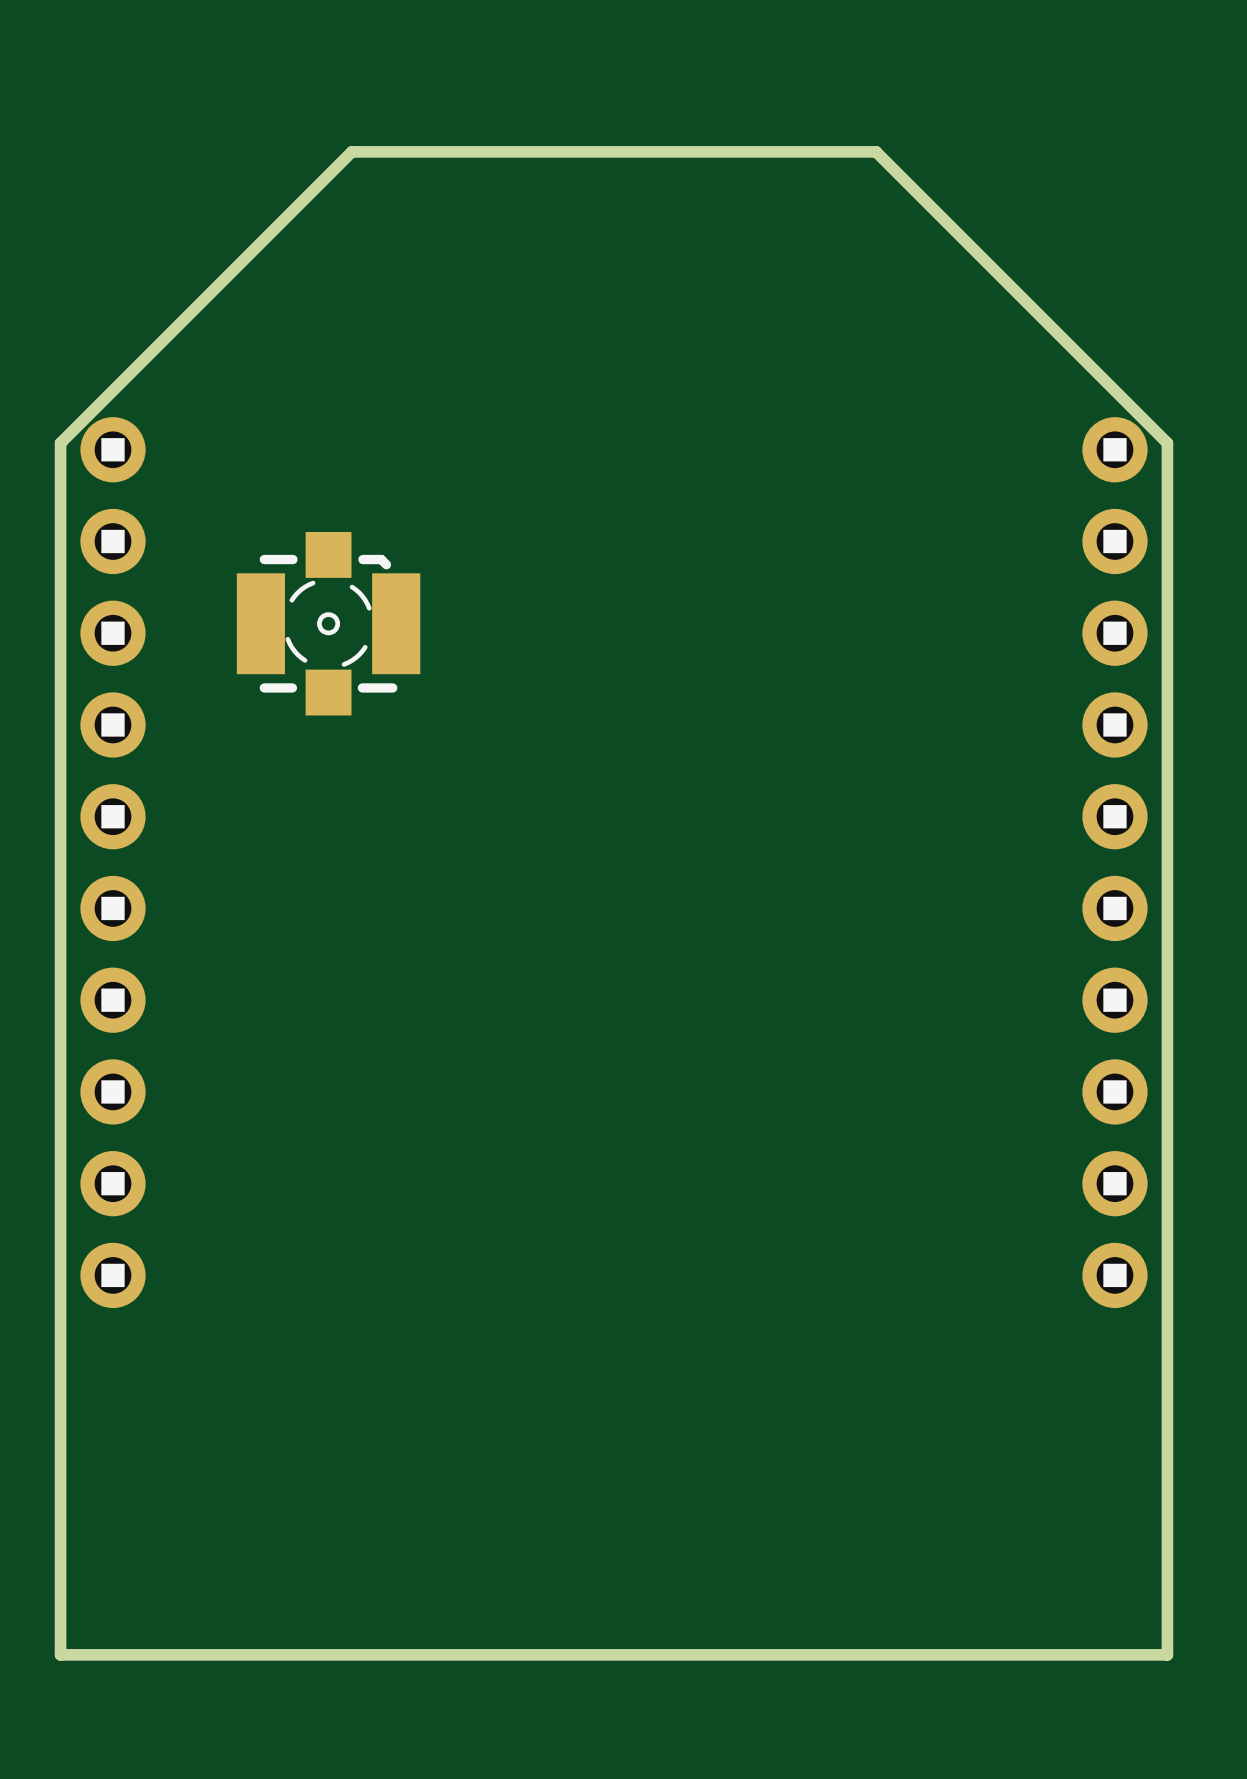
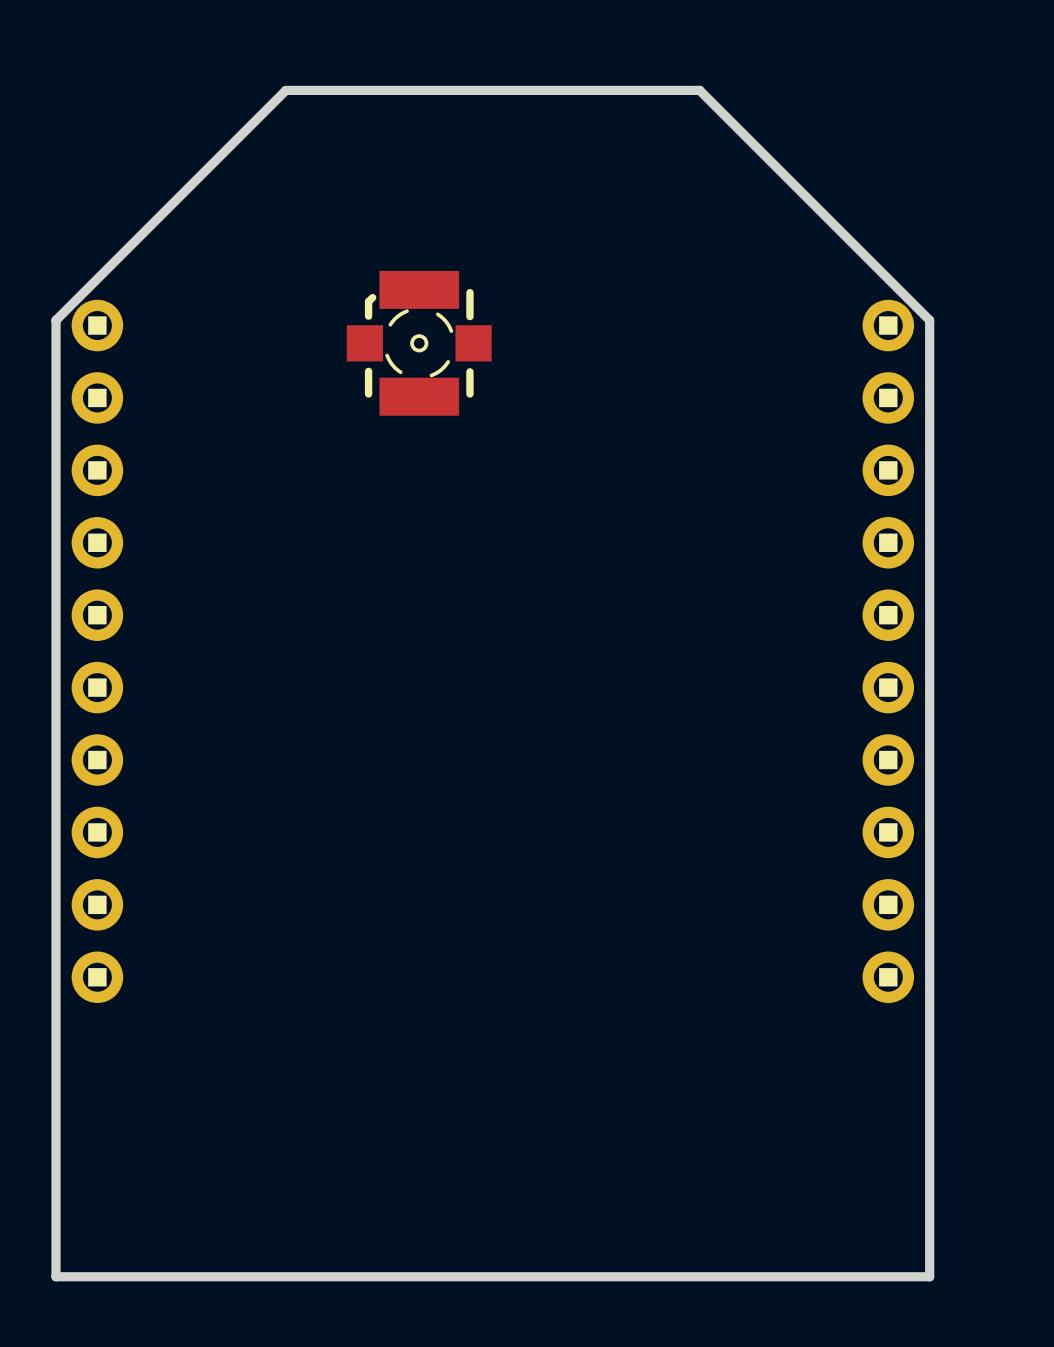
part rotation: 0° (328, 623) -> 90° counterclockwise (419, 343)
part position: (328, 623) -> (419, 343)

